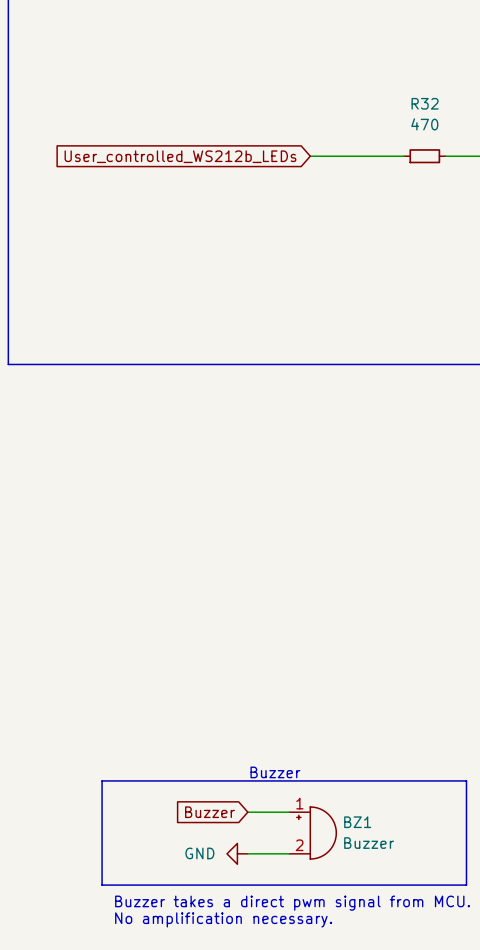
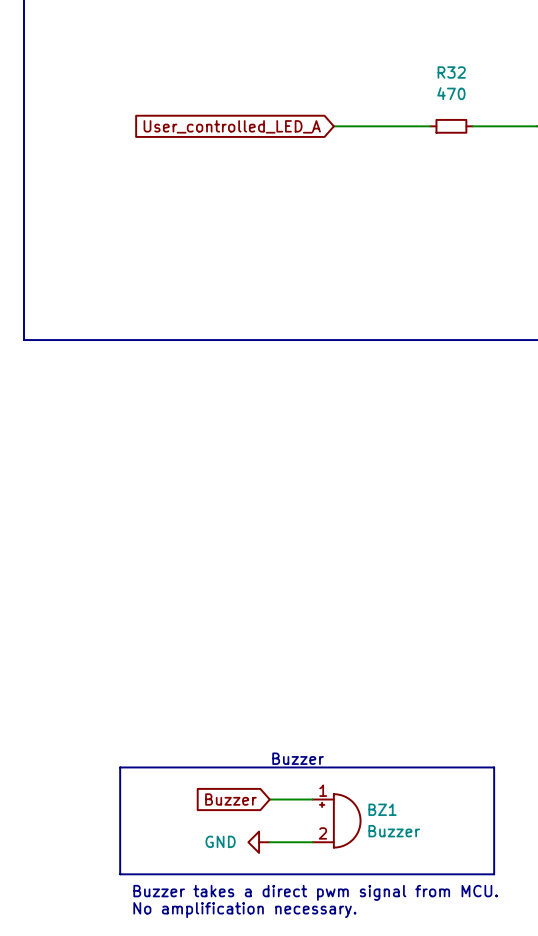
global label: User_controlled_WS212b_LEDs (180, 156) -> User_controlled_LED_A (232, 126)

